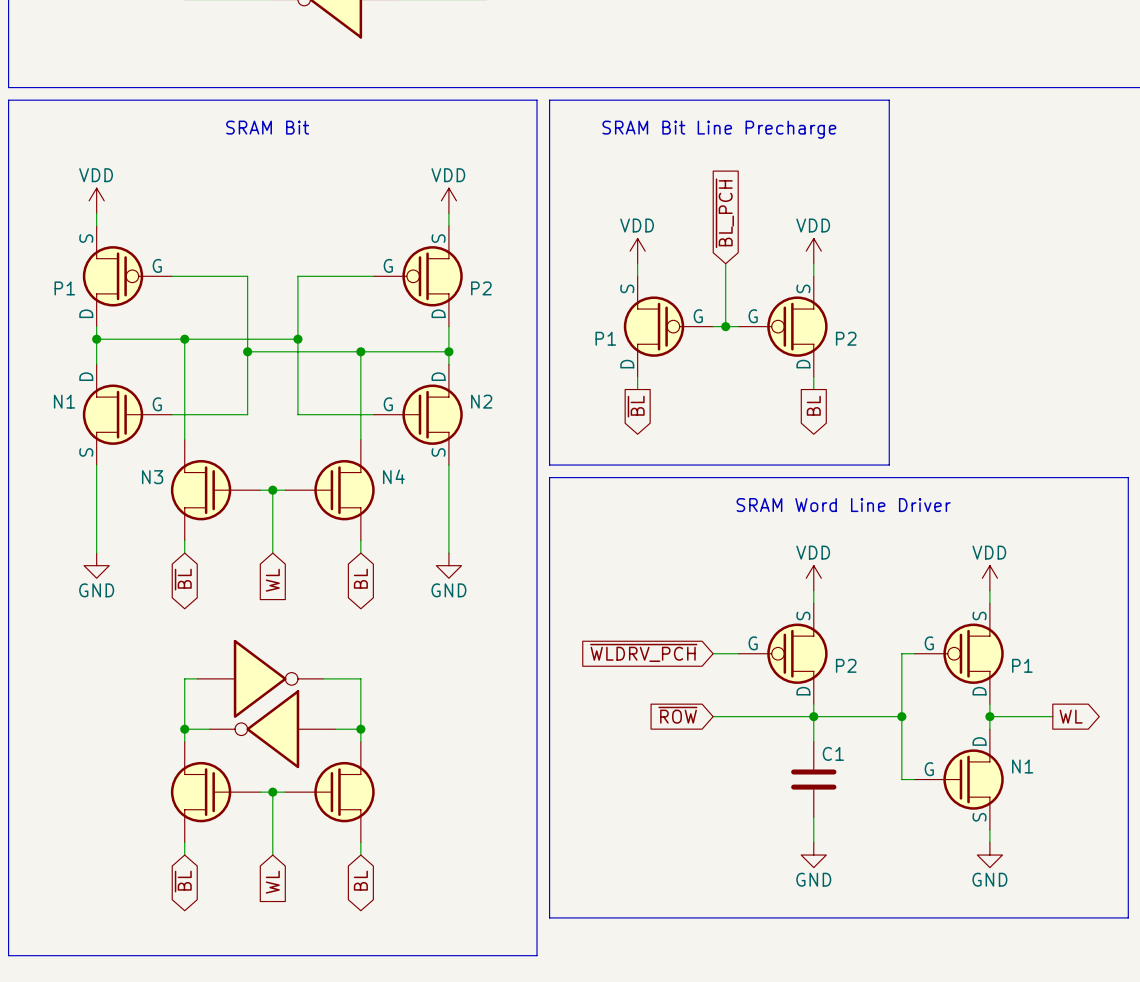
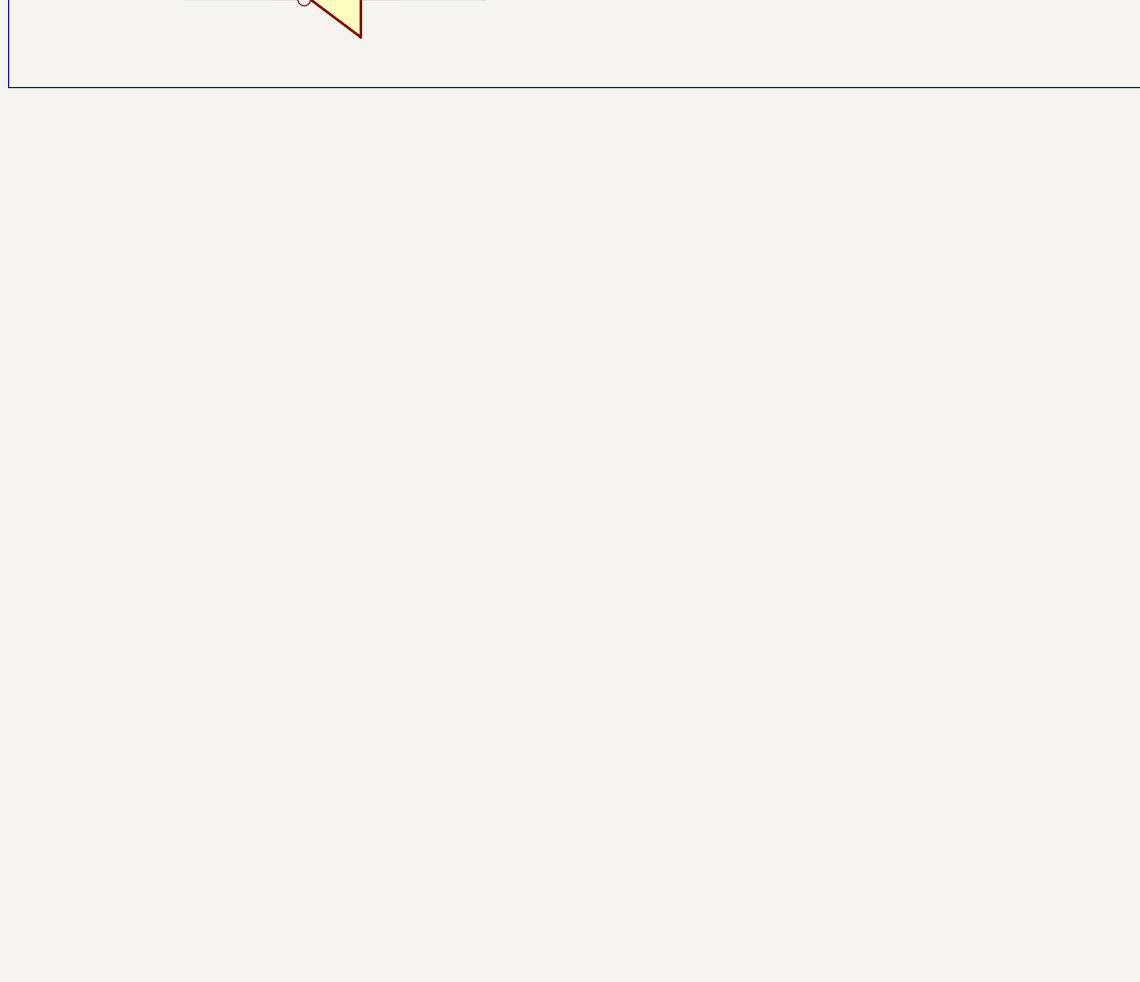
line: (8, 100) (537, 100) (537, 955) (8, 955) (8, 100) -> none
line: (549, 100) (889, 100) (889, 465) (549, 465) (549, 100) -> none
text: SRAM Bit (267, 127) -> none
text: SRAM Bit Line Precharge (719, 129) -> none
power symbol: VDD (96, 200) -> none
power symbol: VDD (448, 200) -> none
wire: (96, 213) (96, 225) -> none
wire: (448, 213) (448, 225) -> none
global label: ~{BL_PCH} (724, 213) -> none
power symbol: VDD (637, 251) -> none
power symbol: VDD (813, 251) -> none
wire: (637, 263) (637, 276) -> none
wire: (725, 263) (725, 326) -> none
wire: (813, 263) (813, 276) -> none
P1: (127, 276) -> none
wire: (172, 276) (247, 276) (247, 414) (172, 414) -> none
wire: (373, 276) (297, 276) (297, 414) (373, 414) -> none
P2: (418, 276) -> none
wire: (96, 326) (96, 364) -> none
wire: (448, 326) (448, 364) -> none
P1: (668, 326) -> none
wire: (713, 326) (738, 326) -> none
junction: (725, 326) -> none
P2: (782, 326) -> none
wire: (96, 339) (297, 339) -> none
junction: (96, 339) -> none
wire: (184, 339) (184, 439) -> none
junction: (184, 339) -> none
junction: (297, 339) -> none
wire: (247, 351) (448, 351) -> none
junction: (247, 351) -> none
wire: (360, 351) (360, 439) -> none
junction: (360, 351) -> none
junction: (448, 351) -> none
wire: (637, 376) (637, 389) -> none
wire: (813, 376) (813, 389) -> none
global label: BL (813, 405) -> none
global label: ~{BL} (636, 406) -> none
N1: (127, 414) -> none
N2: (418, 414) -> none
wire: (96, 465) (96, 553) -> none
wire: (448, 465) (448, 553) -> none
line: (549, 477) (549, 917) (1128, 917) (1128, 477) (549, 477) -> none
N3: (215, 490) -> none
wire: (260, 490) (285, 490) -> none
wire: (272, 490) (272, 553) -> none
junction: (272, 490) -> none
N4: (330, 490) -> none
text: SRAM Word Line Driver (843, 505) -> none
wire: (184, 540) (184, 553) -> none
wire: (360, 540) (360, 553) -> none
power symbol: GND (96, 565) -> none
power symbol: GND (448, 565) -> none
global label: BL (360, 578) -> none
power symbol: VDD (813, 578) -> none
power symbol: VDD (989, 578) -> none
global label: ~{BL} (183, 579) -> none
global label: WL (272, 580) -> none
wire: (813, 590) (813, 603) -> none
wire: (989, 590) (989, 603) -> none
global label: ~{WLDRV_PCH} (643, 652) -> none
wire: (713, 653) (738, 653) -> none
P2: (782, 653) -> none
wire: (914, 653) (901, 653) (901, 779) (914, 779) -> none
P1: (959, 653) -> none
wire: (197, 678) (184, 678) (184, 741) -> none
part: (260, 678) -> none
wire: (323, 678) (360, 678) (360, 741) -> none
wire: (813, 704) (813, 741) -> none
wire: (989, 704) (989, 729) -> none
global label: ~{ROW} (677, 715) -> none
wire: (713, 716) (901, 716) -> none
junction: (813, 716) -> none
junction: (901, 716) -> none
wire: (989, 716) (1052, 716) -> none
junction: (989, 716) -> none
global label: WL (1071, 716) -> none
wire: (184, 729) (209, 729) -> none
junction: (184, 729) -> none
part: (272, 729) -> none
wire: (335, 729) (360, 729) -> none
junction: (360, 729) -> none
C1: (813, 779) -> none
N1: (959, 779) -> none
part: (215, 792) -> none
wire: (260, 792) (285, 792) -> none
wire: (272, 792) (272, 855) -> none
junction: (272, 792) -> none
part: (330, 792) -> none
wire: (813, 817) (813, 842) -> none
wire: (989, 829) (989, 842) -> none
wire: (184, 842) (184, 855) -> none
wire: (360, 842) (360, 855) -> none
power symbol: GND (813, 855) -> none
power symbol: GND (989, 855) -> none
global label: BL (360, 880) -> none
global label: ~{BL} (183, 881) -> none
global label: WL (272, 882) -> none

